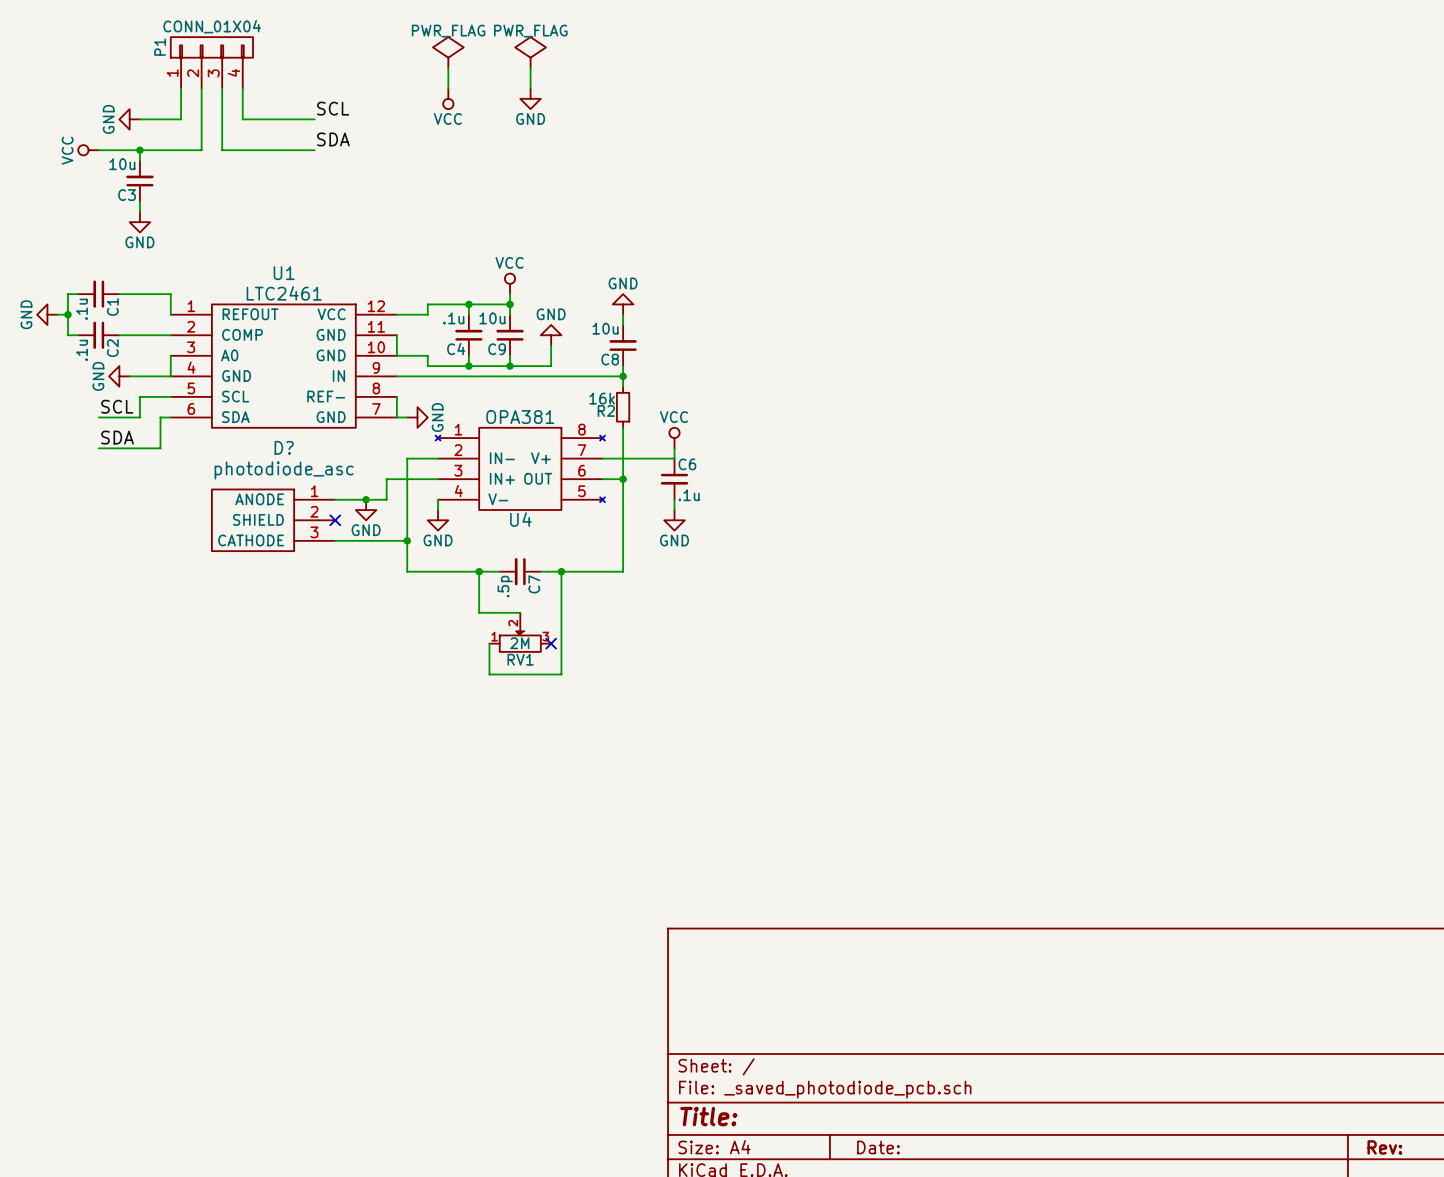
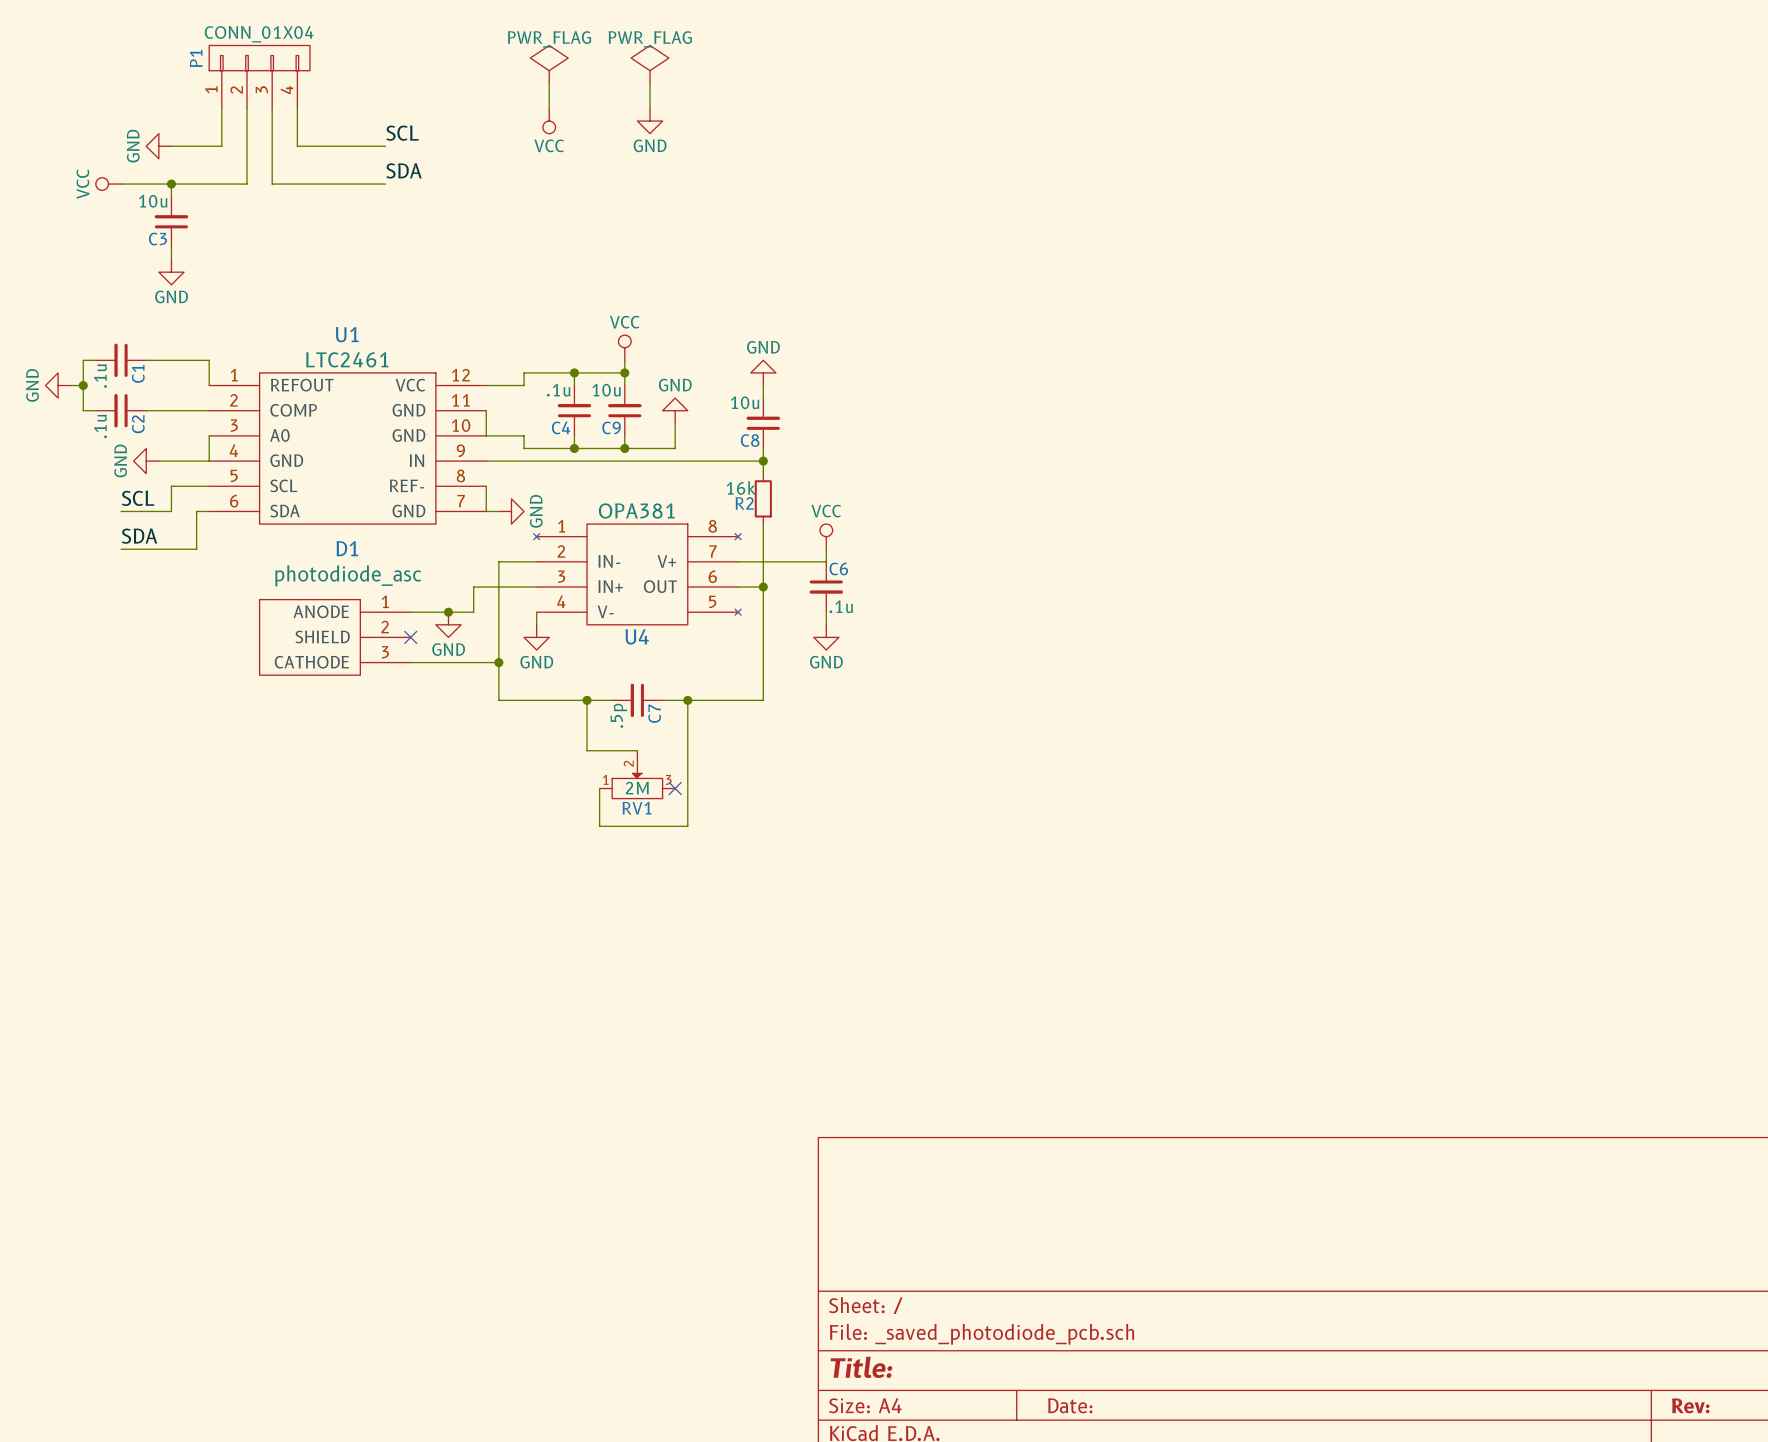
D? name: D? (284, 447) -> D1 (347, 548)

